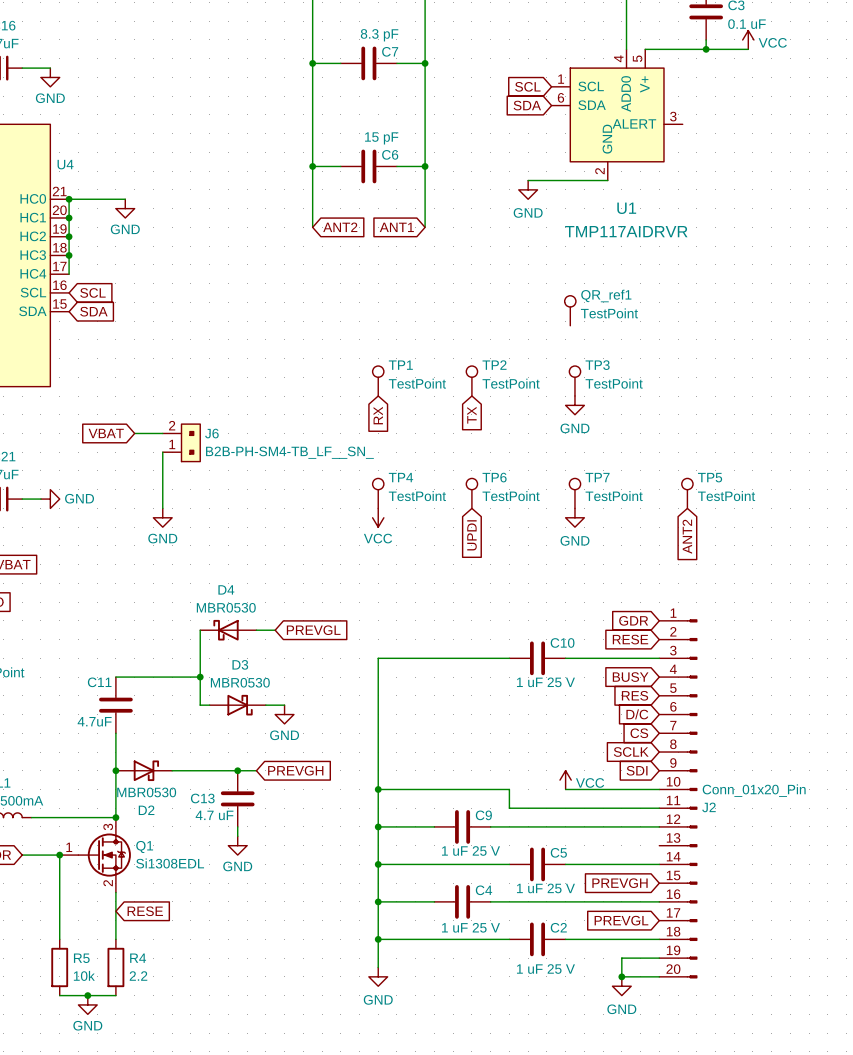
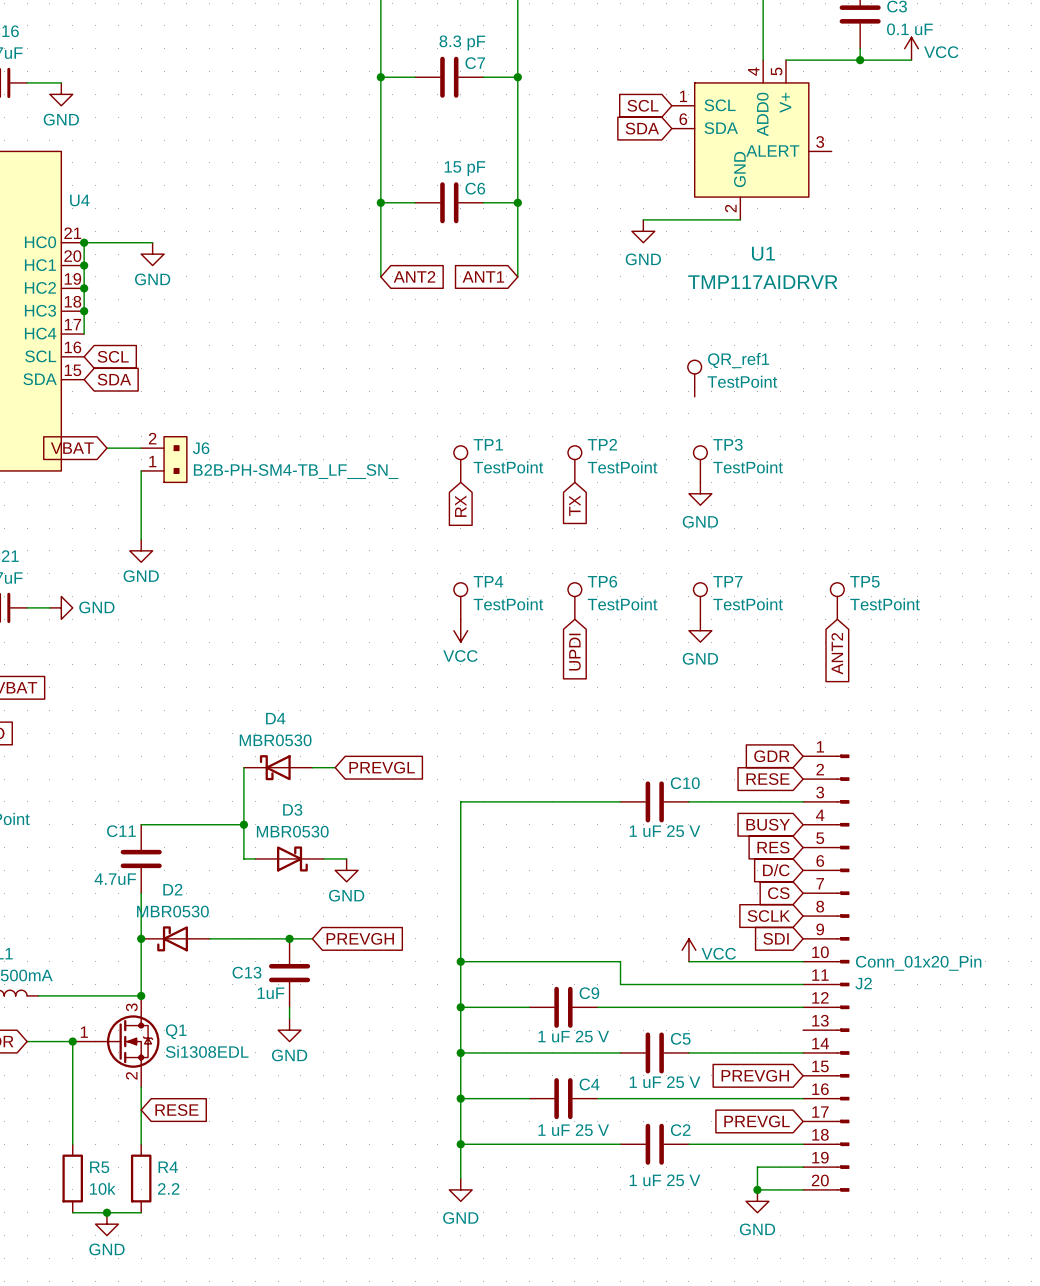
global label position: VBAT (106, 433) -> VBAT (72, 448)
wire: (134, 433) (162, 433) -> (106, 448) (141, 448)
J6 position: (181, 442) -> (164, 459)
wire: (162, 452) (162, 508) -> (141, 470) (141, 539)
power symbol position: GND (162, 517) -> GND (141, 550)
D2 rotation: 0° (146, 770) -> 180° (172, 938)
C13 value: 4.7 uF (214, 815) -> 1uF (271, 993)

